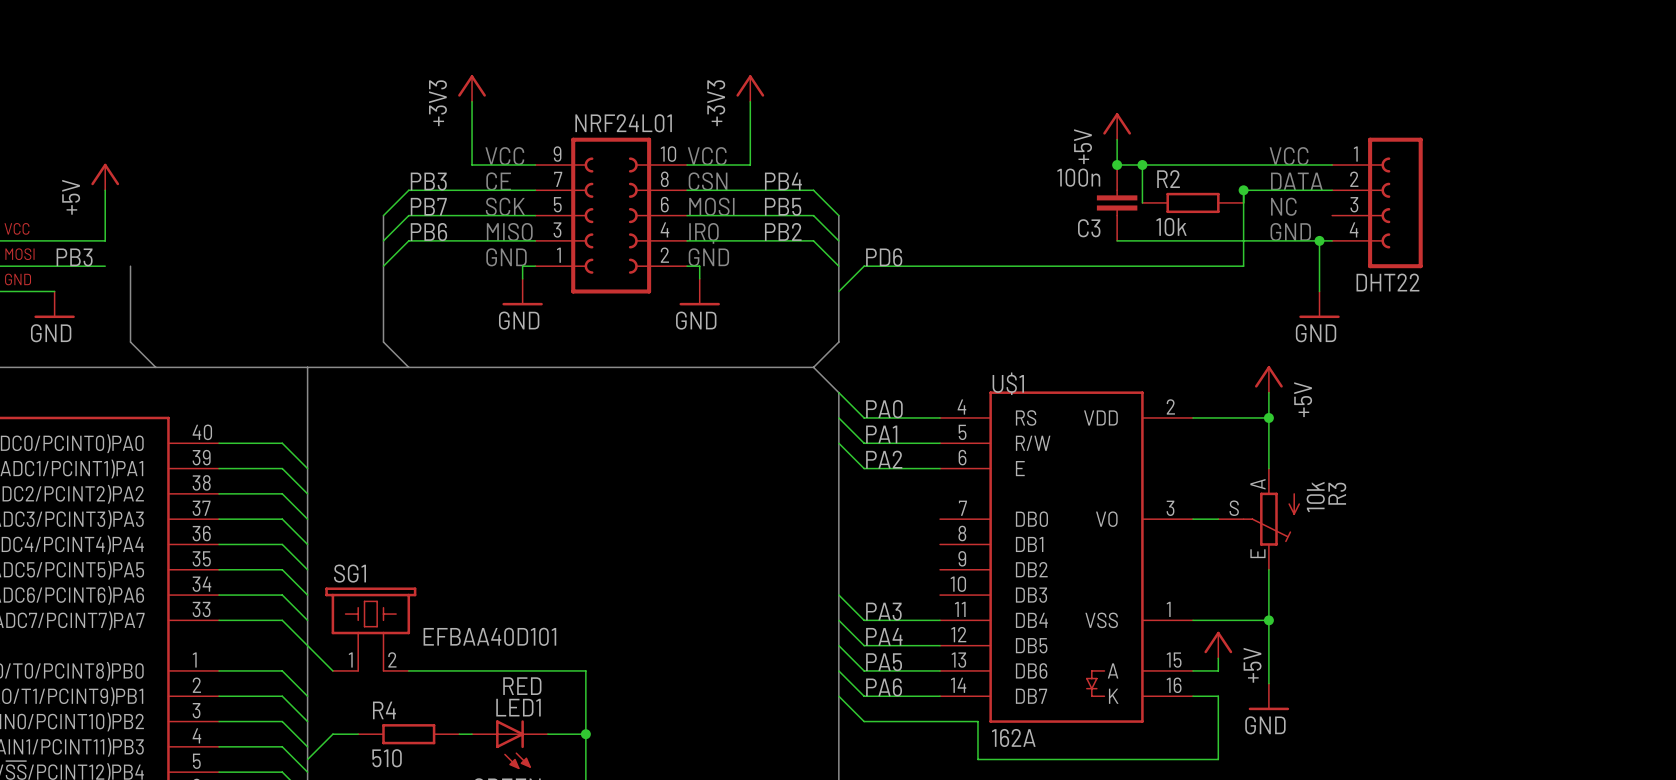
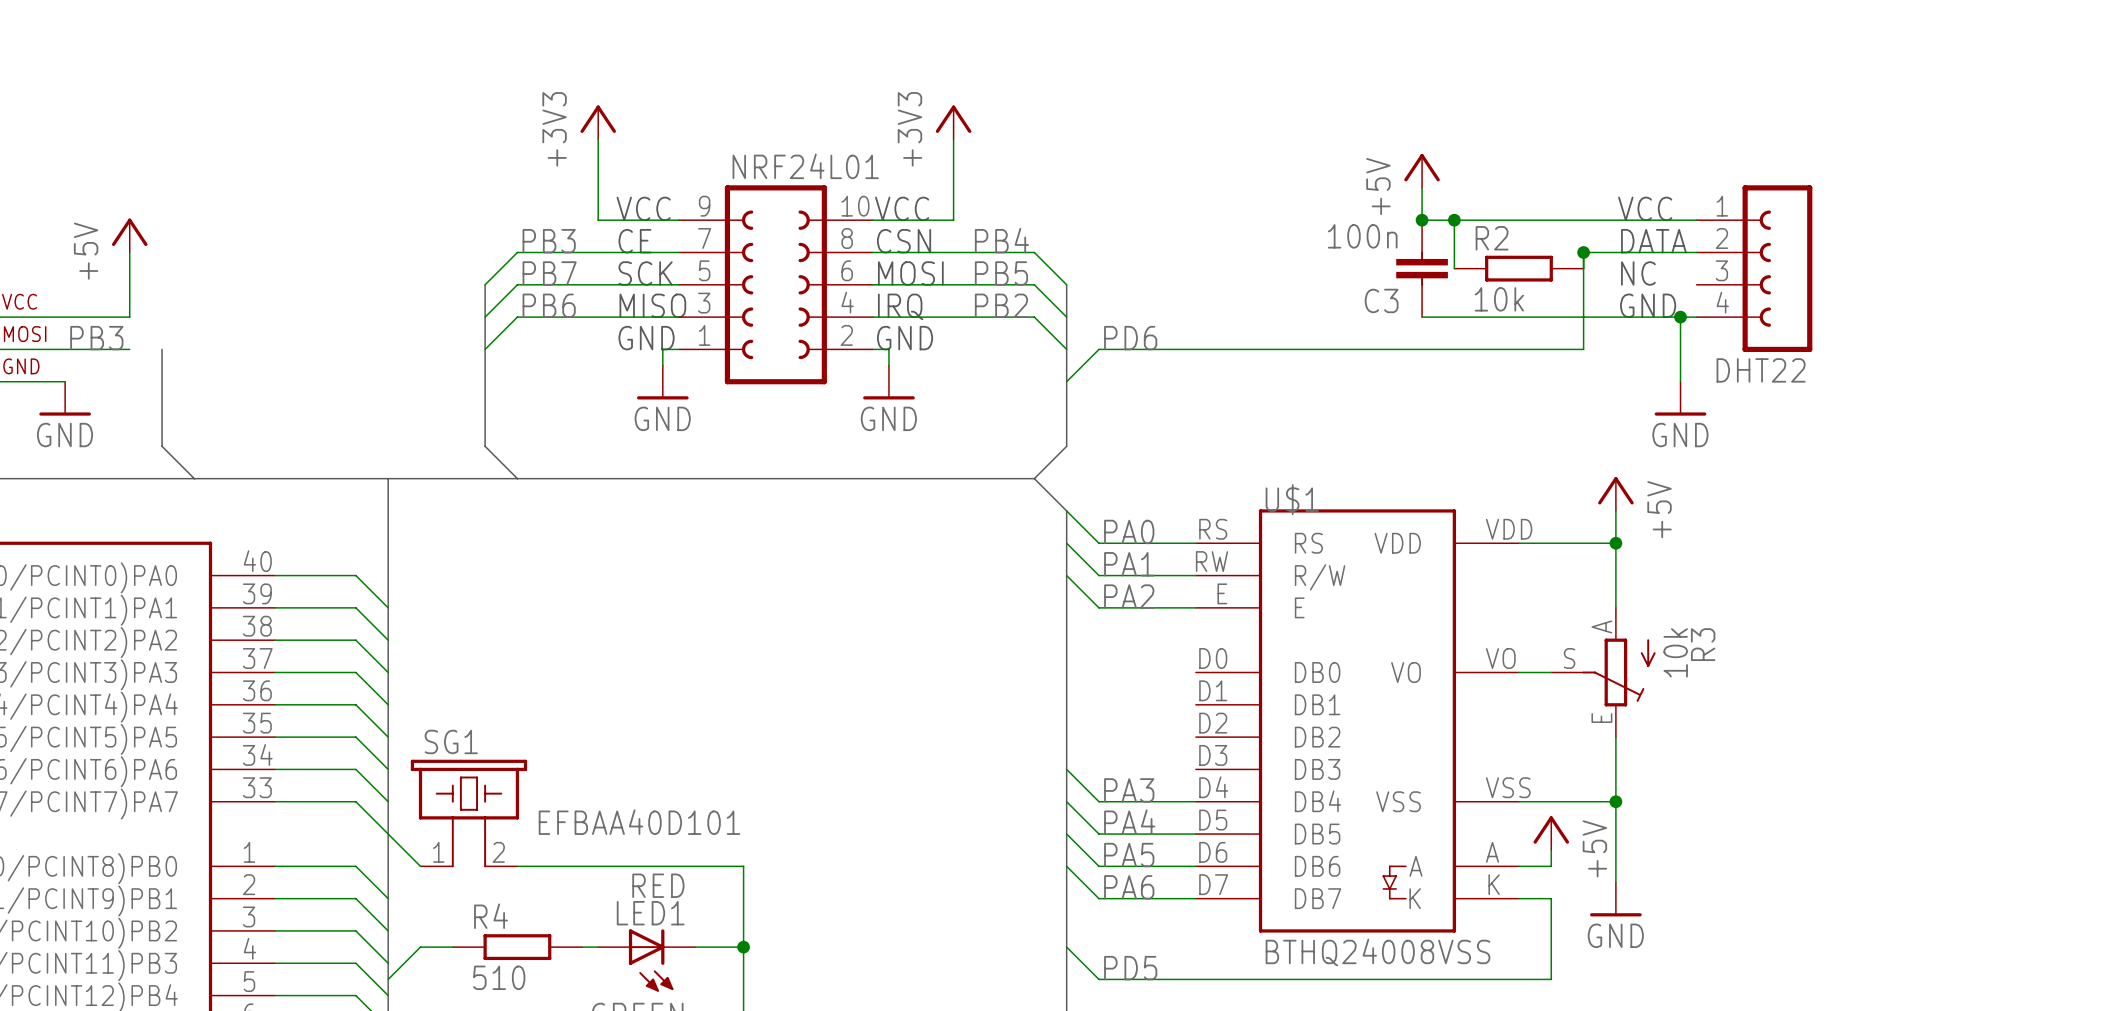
U$1 symbol: [940, 391, 1194, 723] -> [1195, 509, 1519, 933]
wire: (838, 696) (864, 721) (977, 721) (977, 759) -> (1066, 947) (1098, 979) (1244, 979)
U$1 value: 162A (1013, 737) -> BTHQ24008VSS (1378, 952)
label: none -> PD5 (1130, 968)

